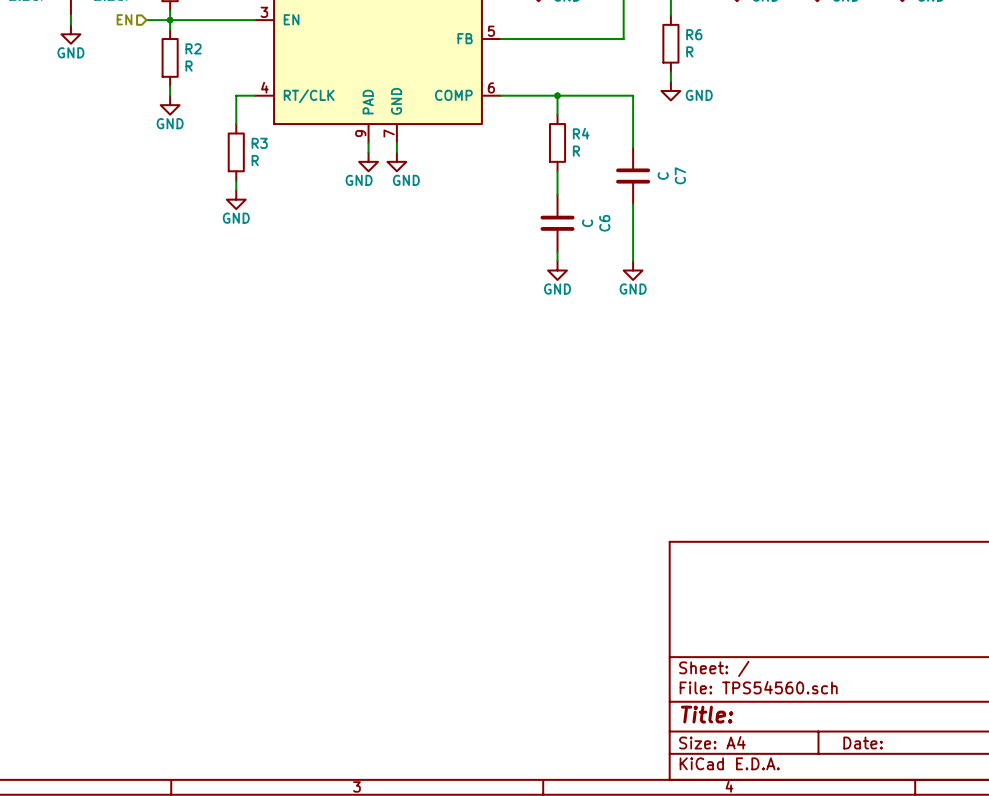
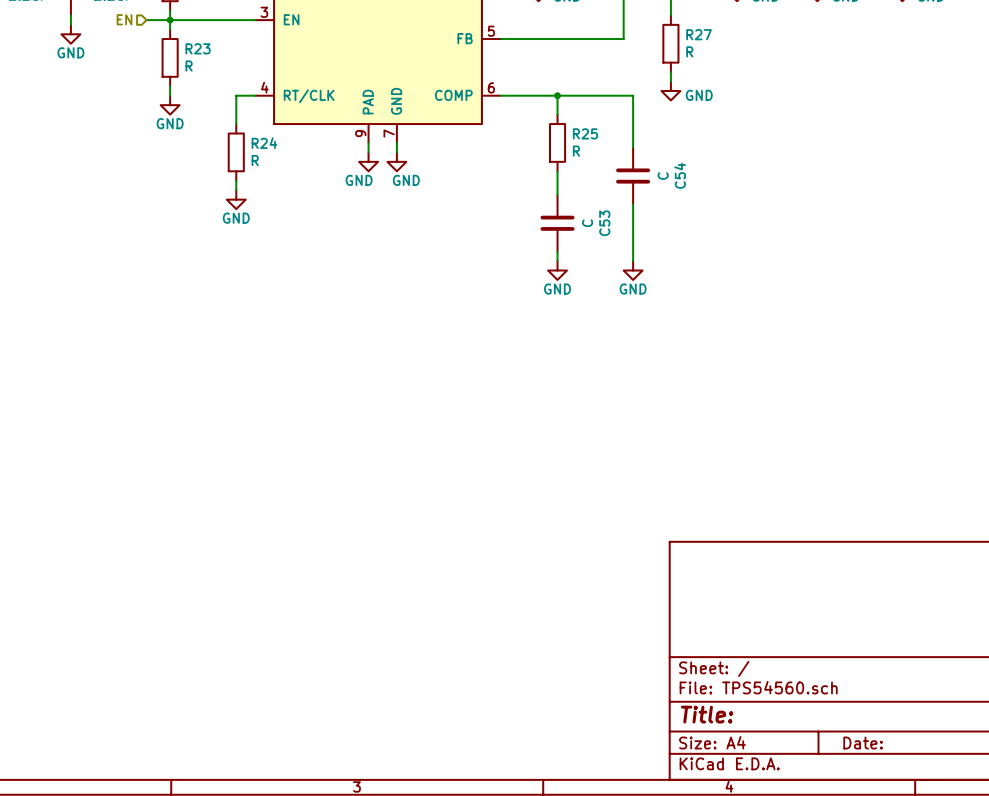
R6 name: R6 (694, 34) -> R27 (699, 34)
R2 name: R2 (193, 48) -> R23 (198, 48)
R4 name: R4 (581, 133) -> R25 (585, 133)
R3 name: R3 (259, 143) -> R24 (264, 143)
C7 name: C7 (680, 175) -> C54 (680, 175)
C6 name: C6 (604, 223) -> C53 (604, 223)

